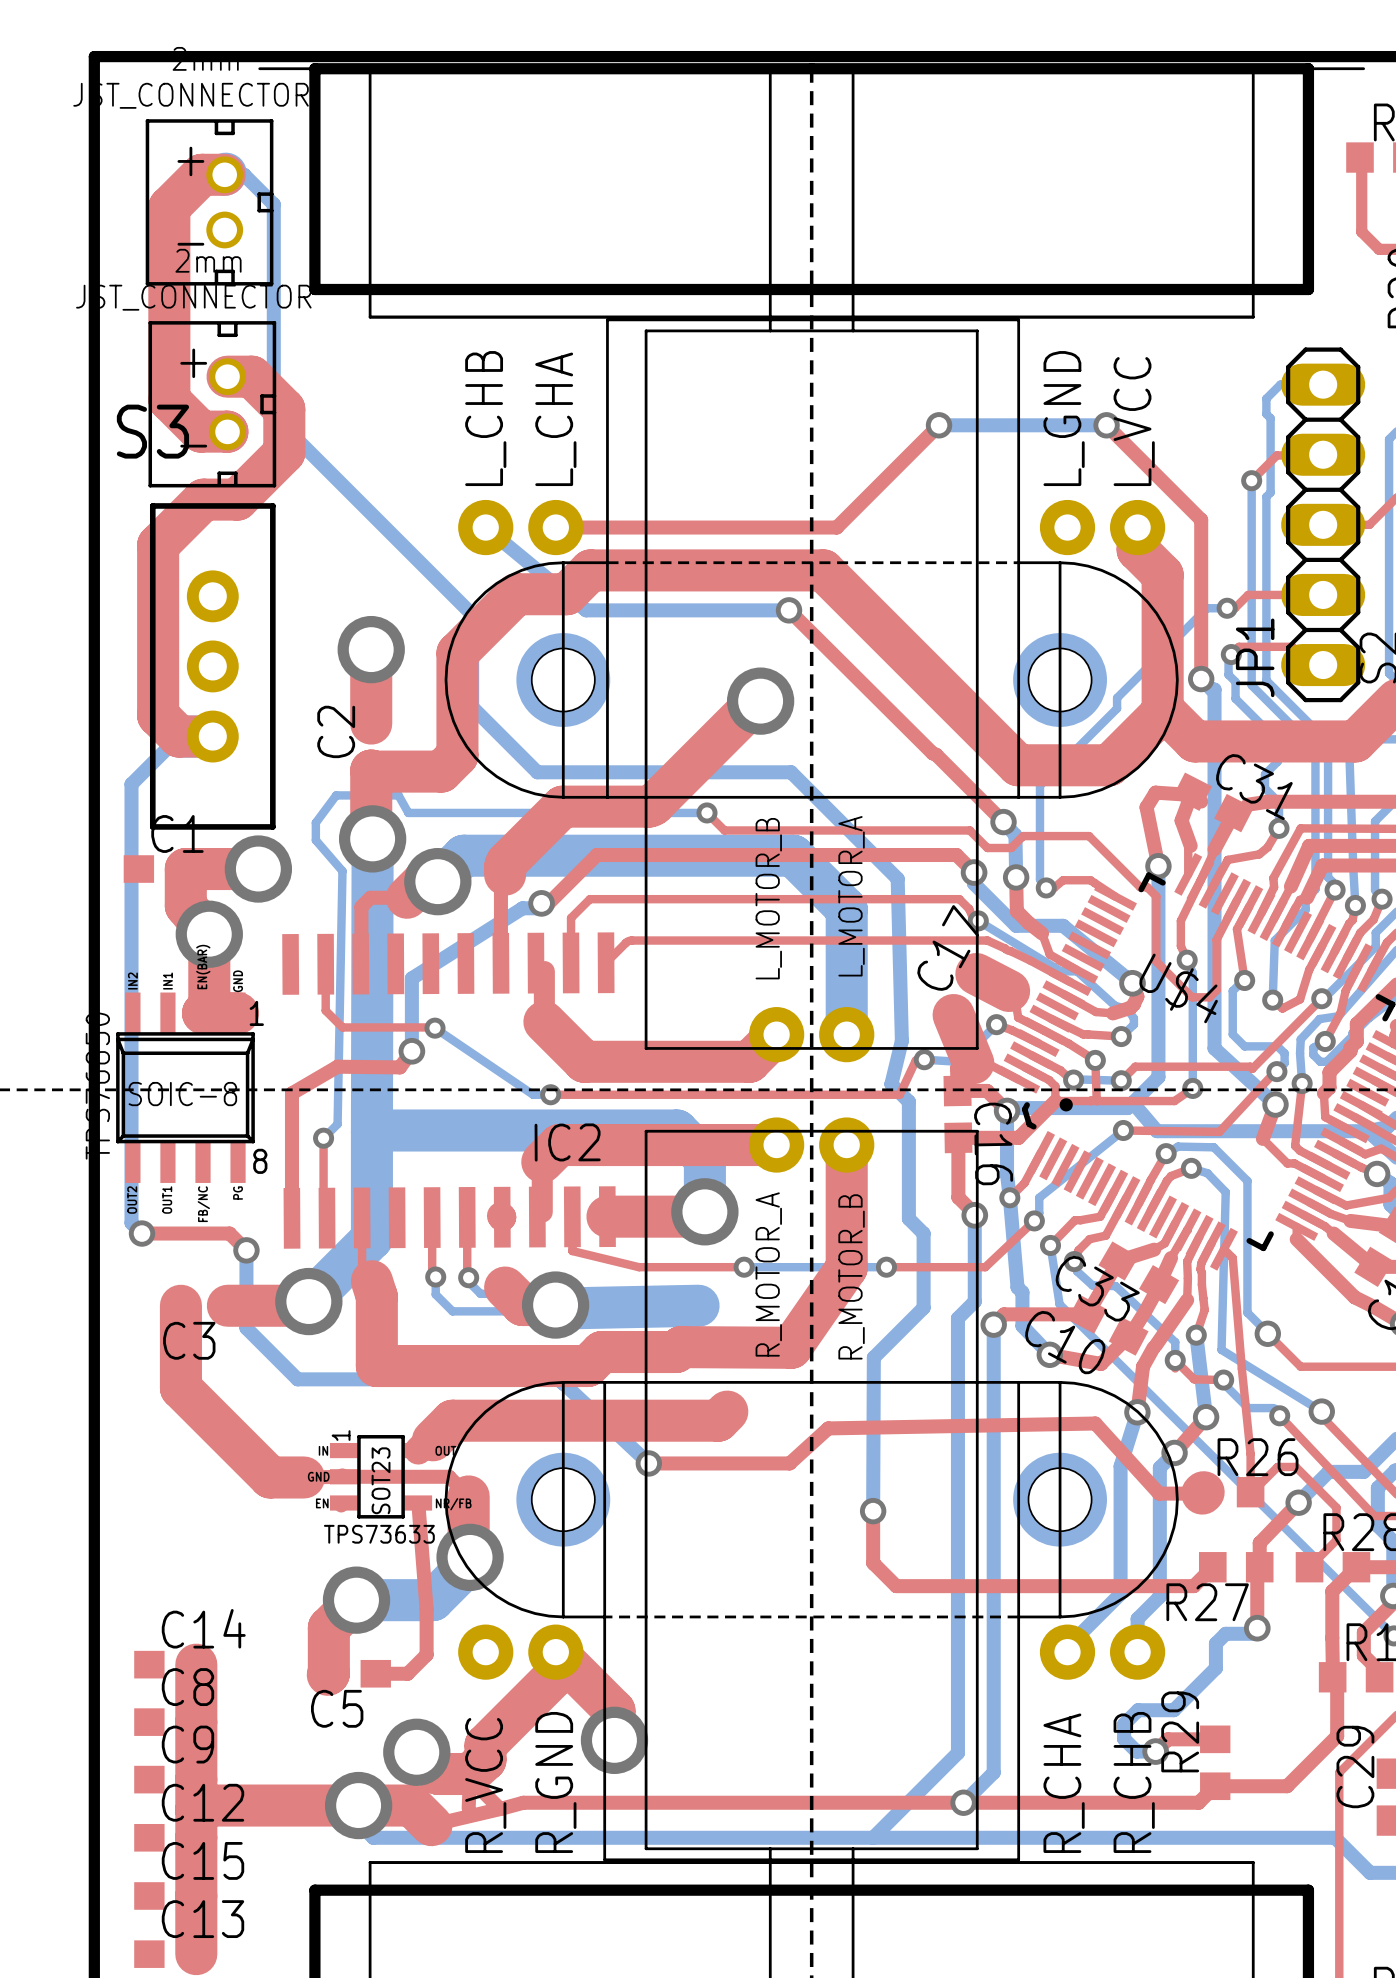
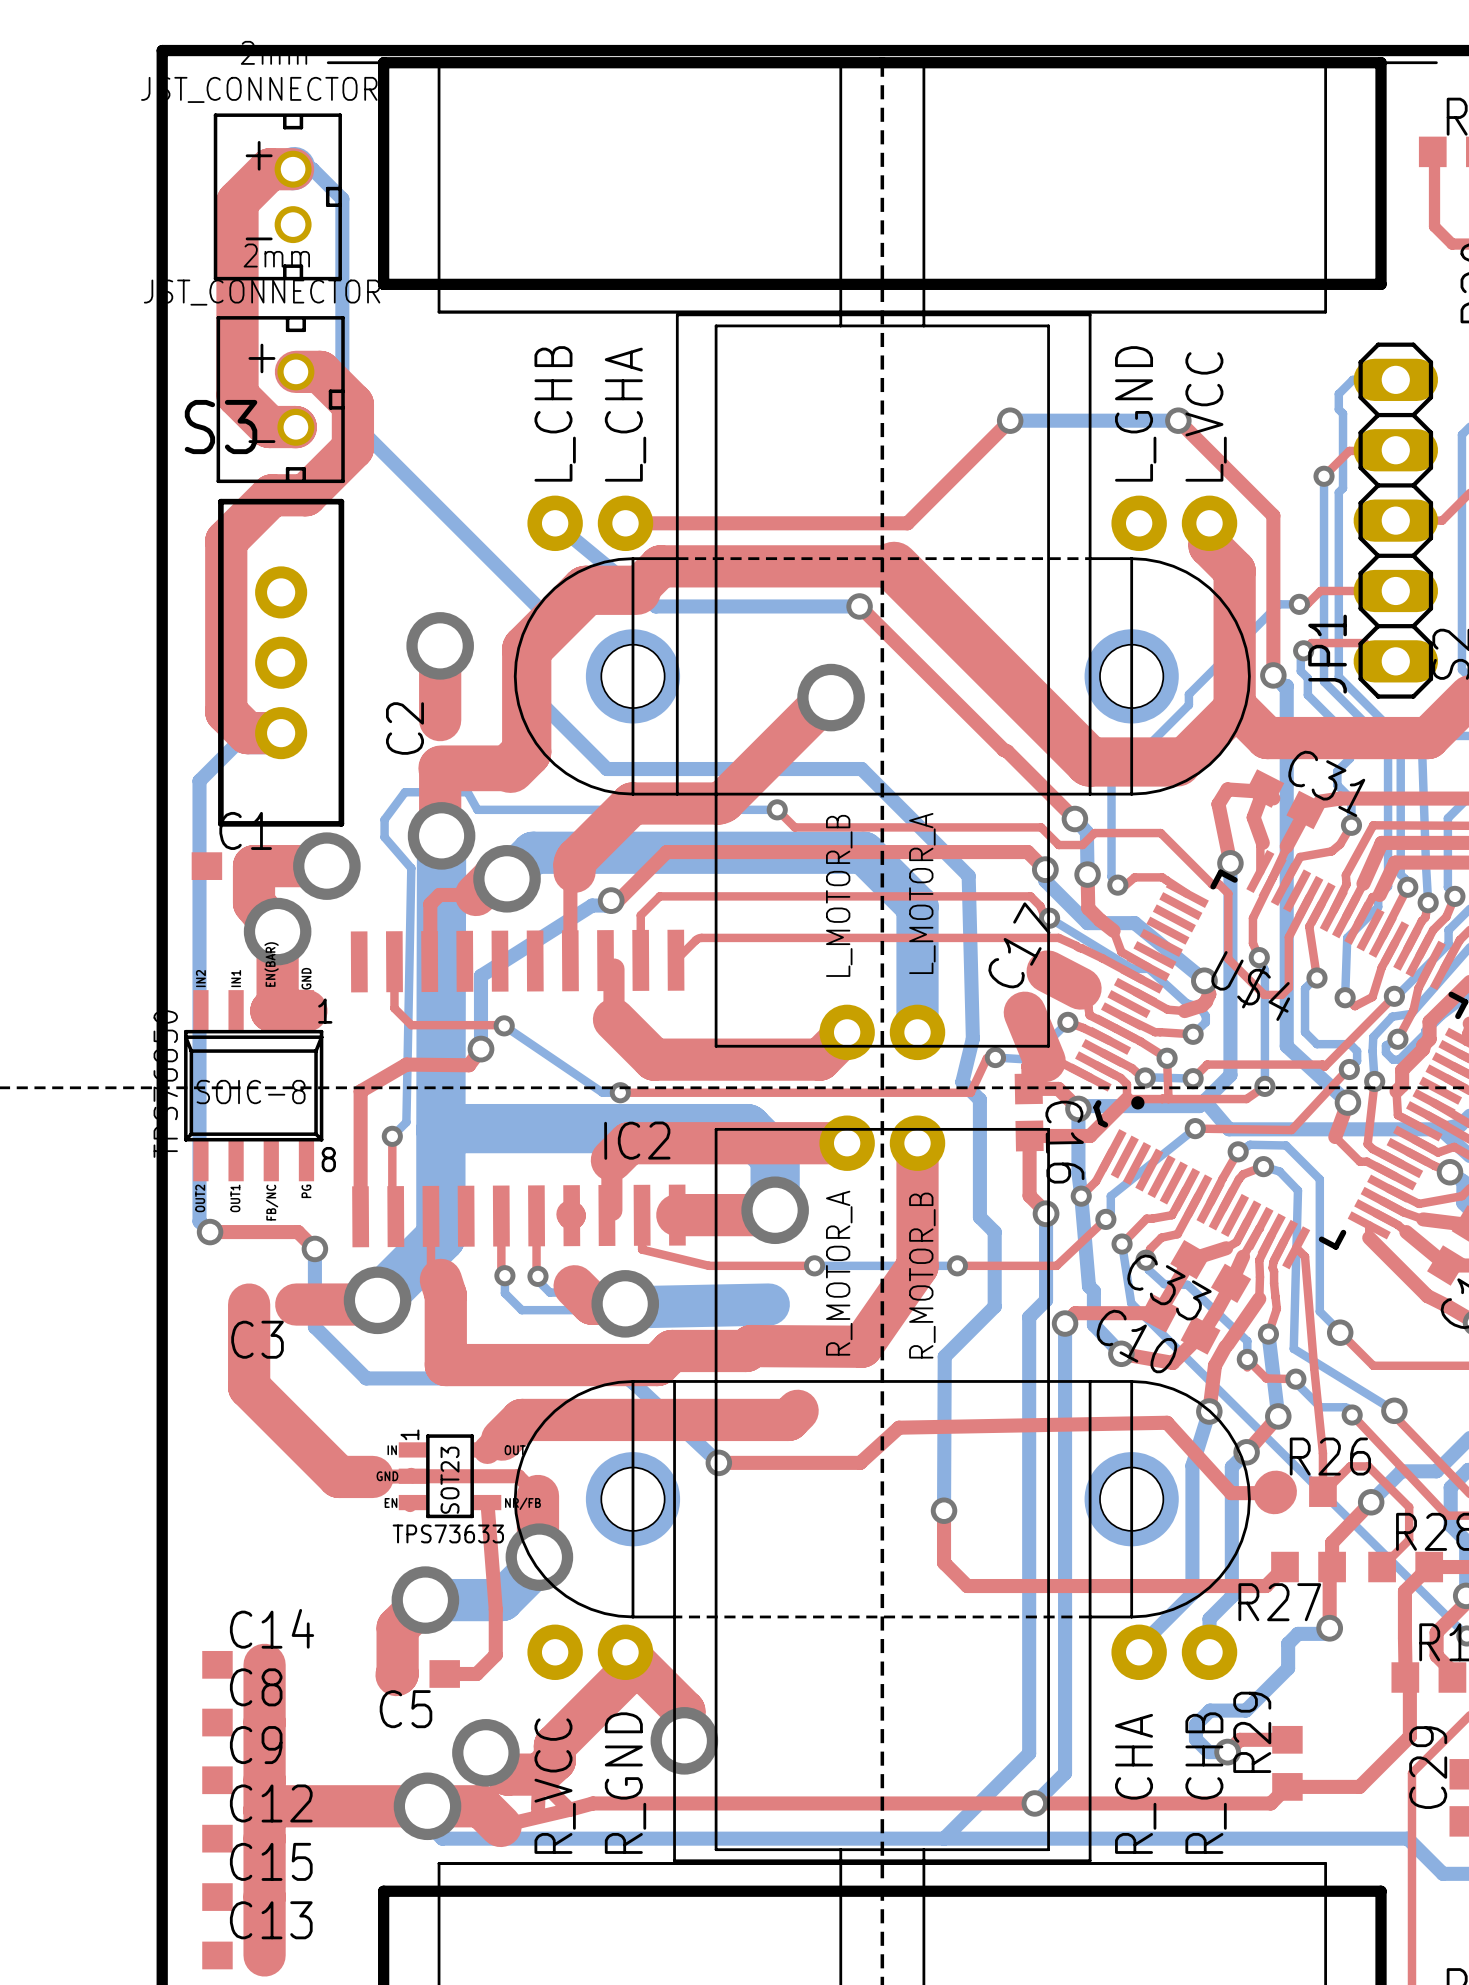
top track width: thin (823, 570) (1018, 765) (1105, 765) -> thick (894, 566) (1089, 761) (1176, 761)
top track width: thin (566, 594) (516, 594) (457, 653) (457, 755) (441, 771) (372, 771) -> thick (636, 590) (585, 590) (526, 649) (526, 752) (510, 768) (441, 768)
bottom track width: thin (372, 838) (371, 1238) (308, 1301) -> thick (441, 835) (440, 1236) (377, 1300)
bottom track width: thin (373, 1130) (676, 1130) (704, 1158) (704, 1211) -> thick (442, 1128) (746, 1128) (775, 1156) (775, 1210)

